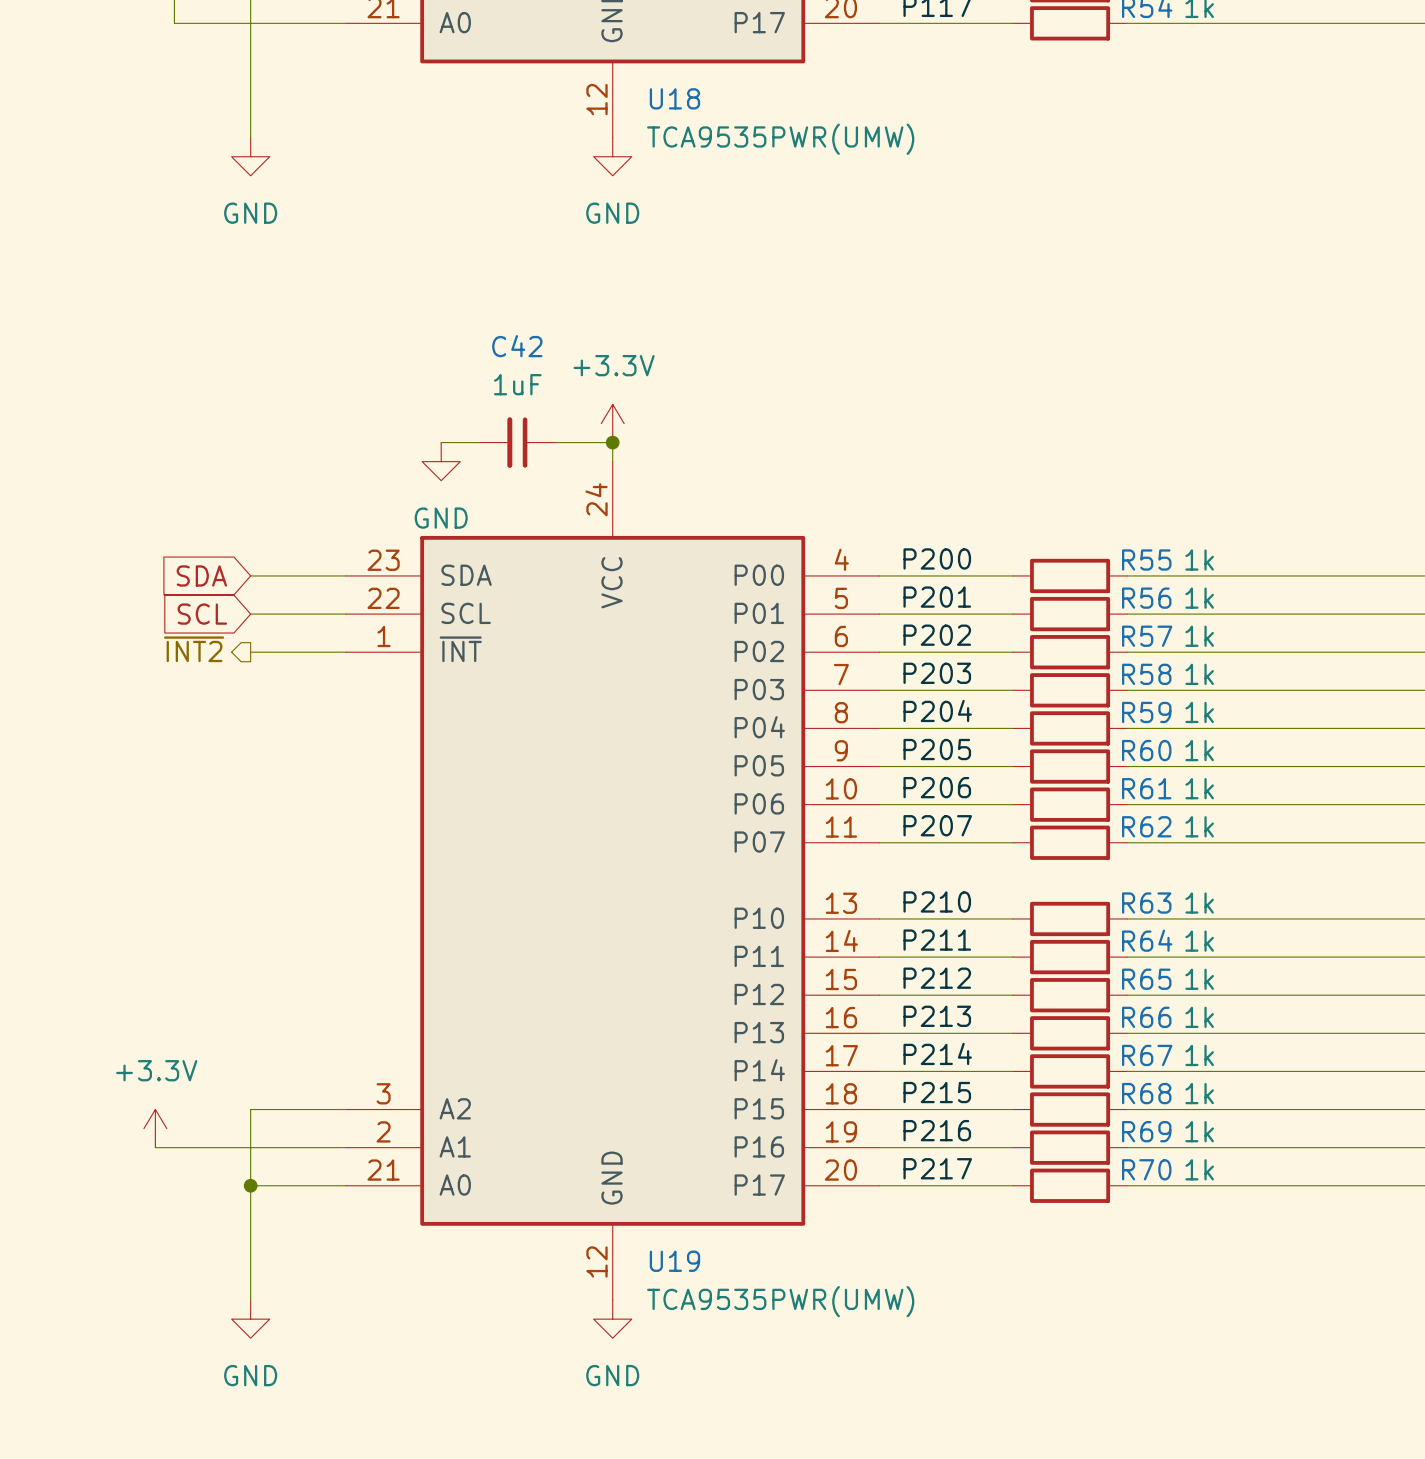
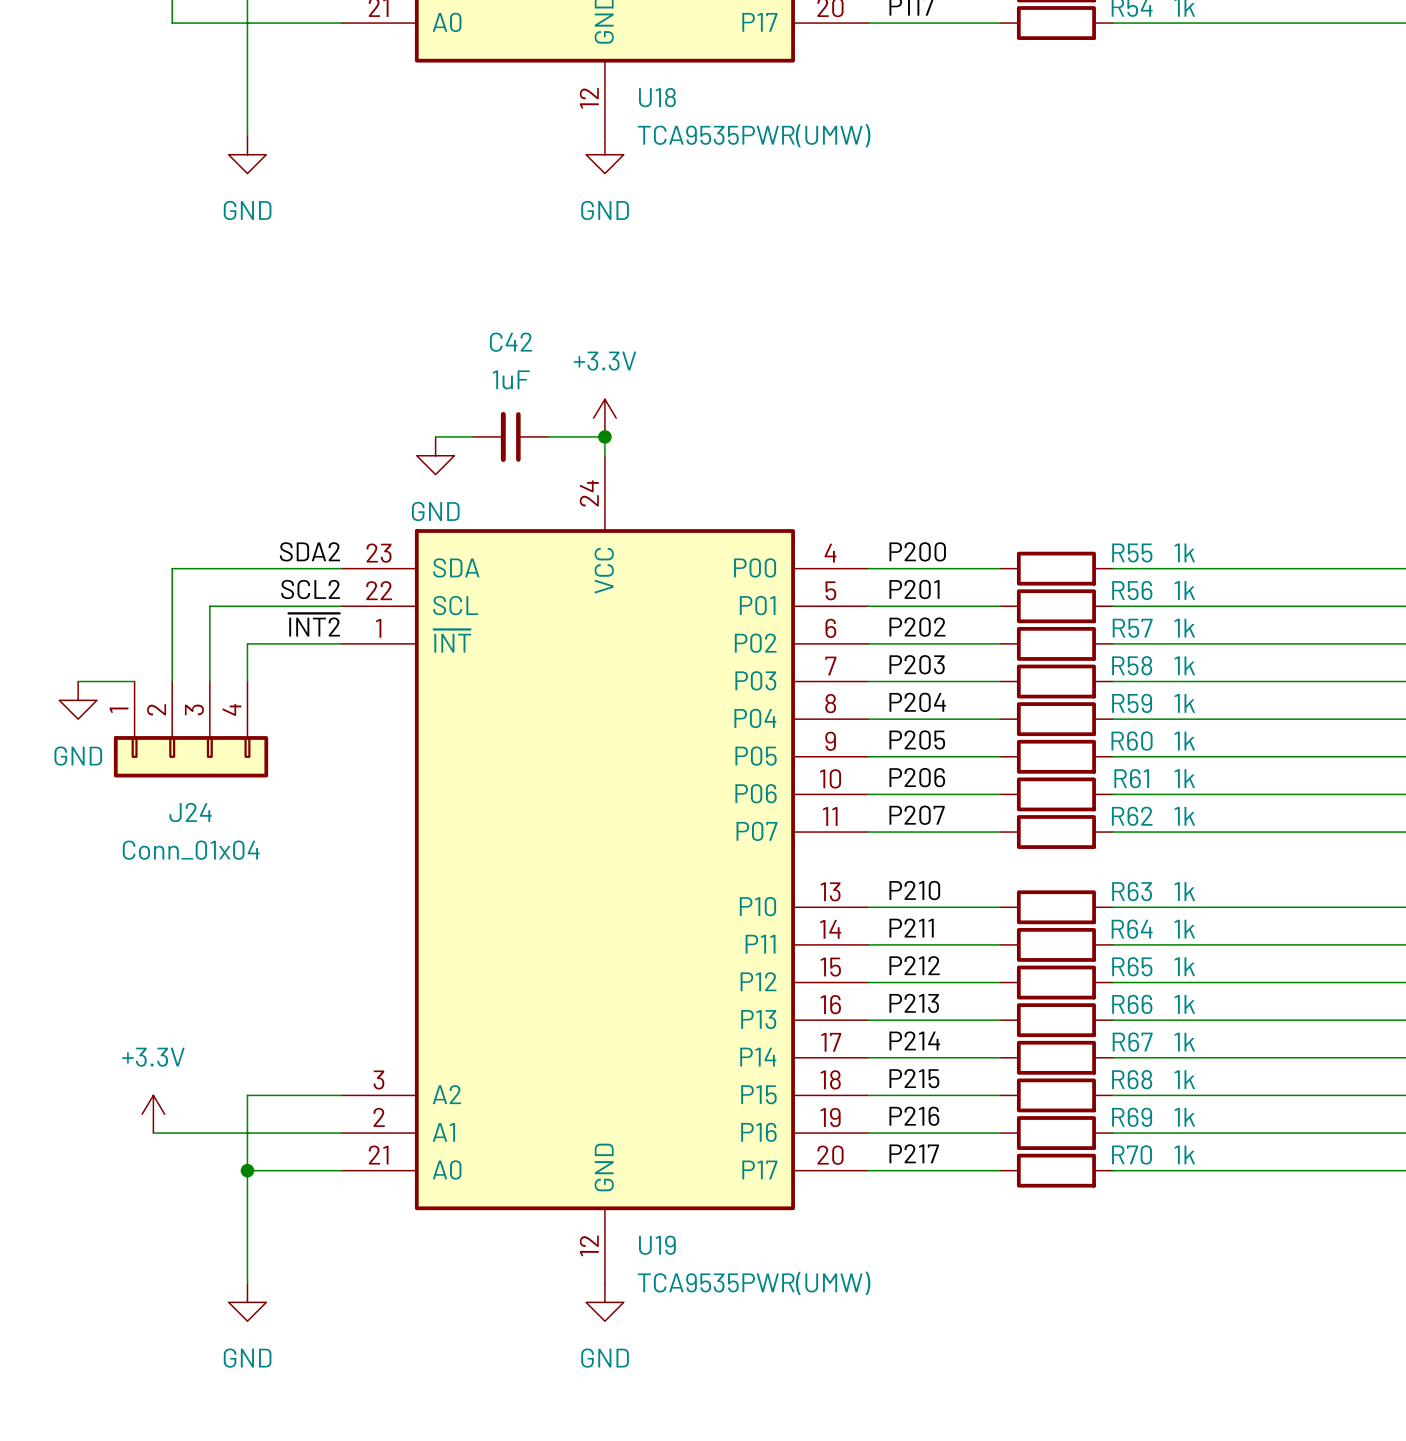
label: none -> SDA2 (309, 551)
global label: SDA (201, 575) -> none
wire: none -> (247, 568) (172, 568) (172, 681)
label: none -> SCL2 (310, 589)
global label: SCL (202, 614) -> none
wire: none -> (247, 606) (209, 606) (209, 681)
label: none -> ~{INT2} (314, 624)
hierarchical label: ~{INT2} (194, 649) -> none
wire: none -> (247, 643) (247, 681)
wire: none -> (78, 681) (134, 681)
power symbol: none -> GND (78, 700)
J24: none -> Conn_01x04 (191, 729)

